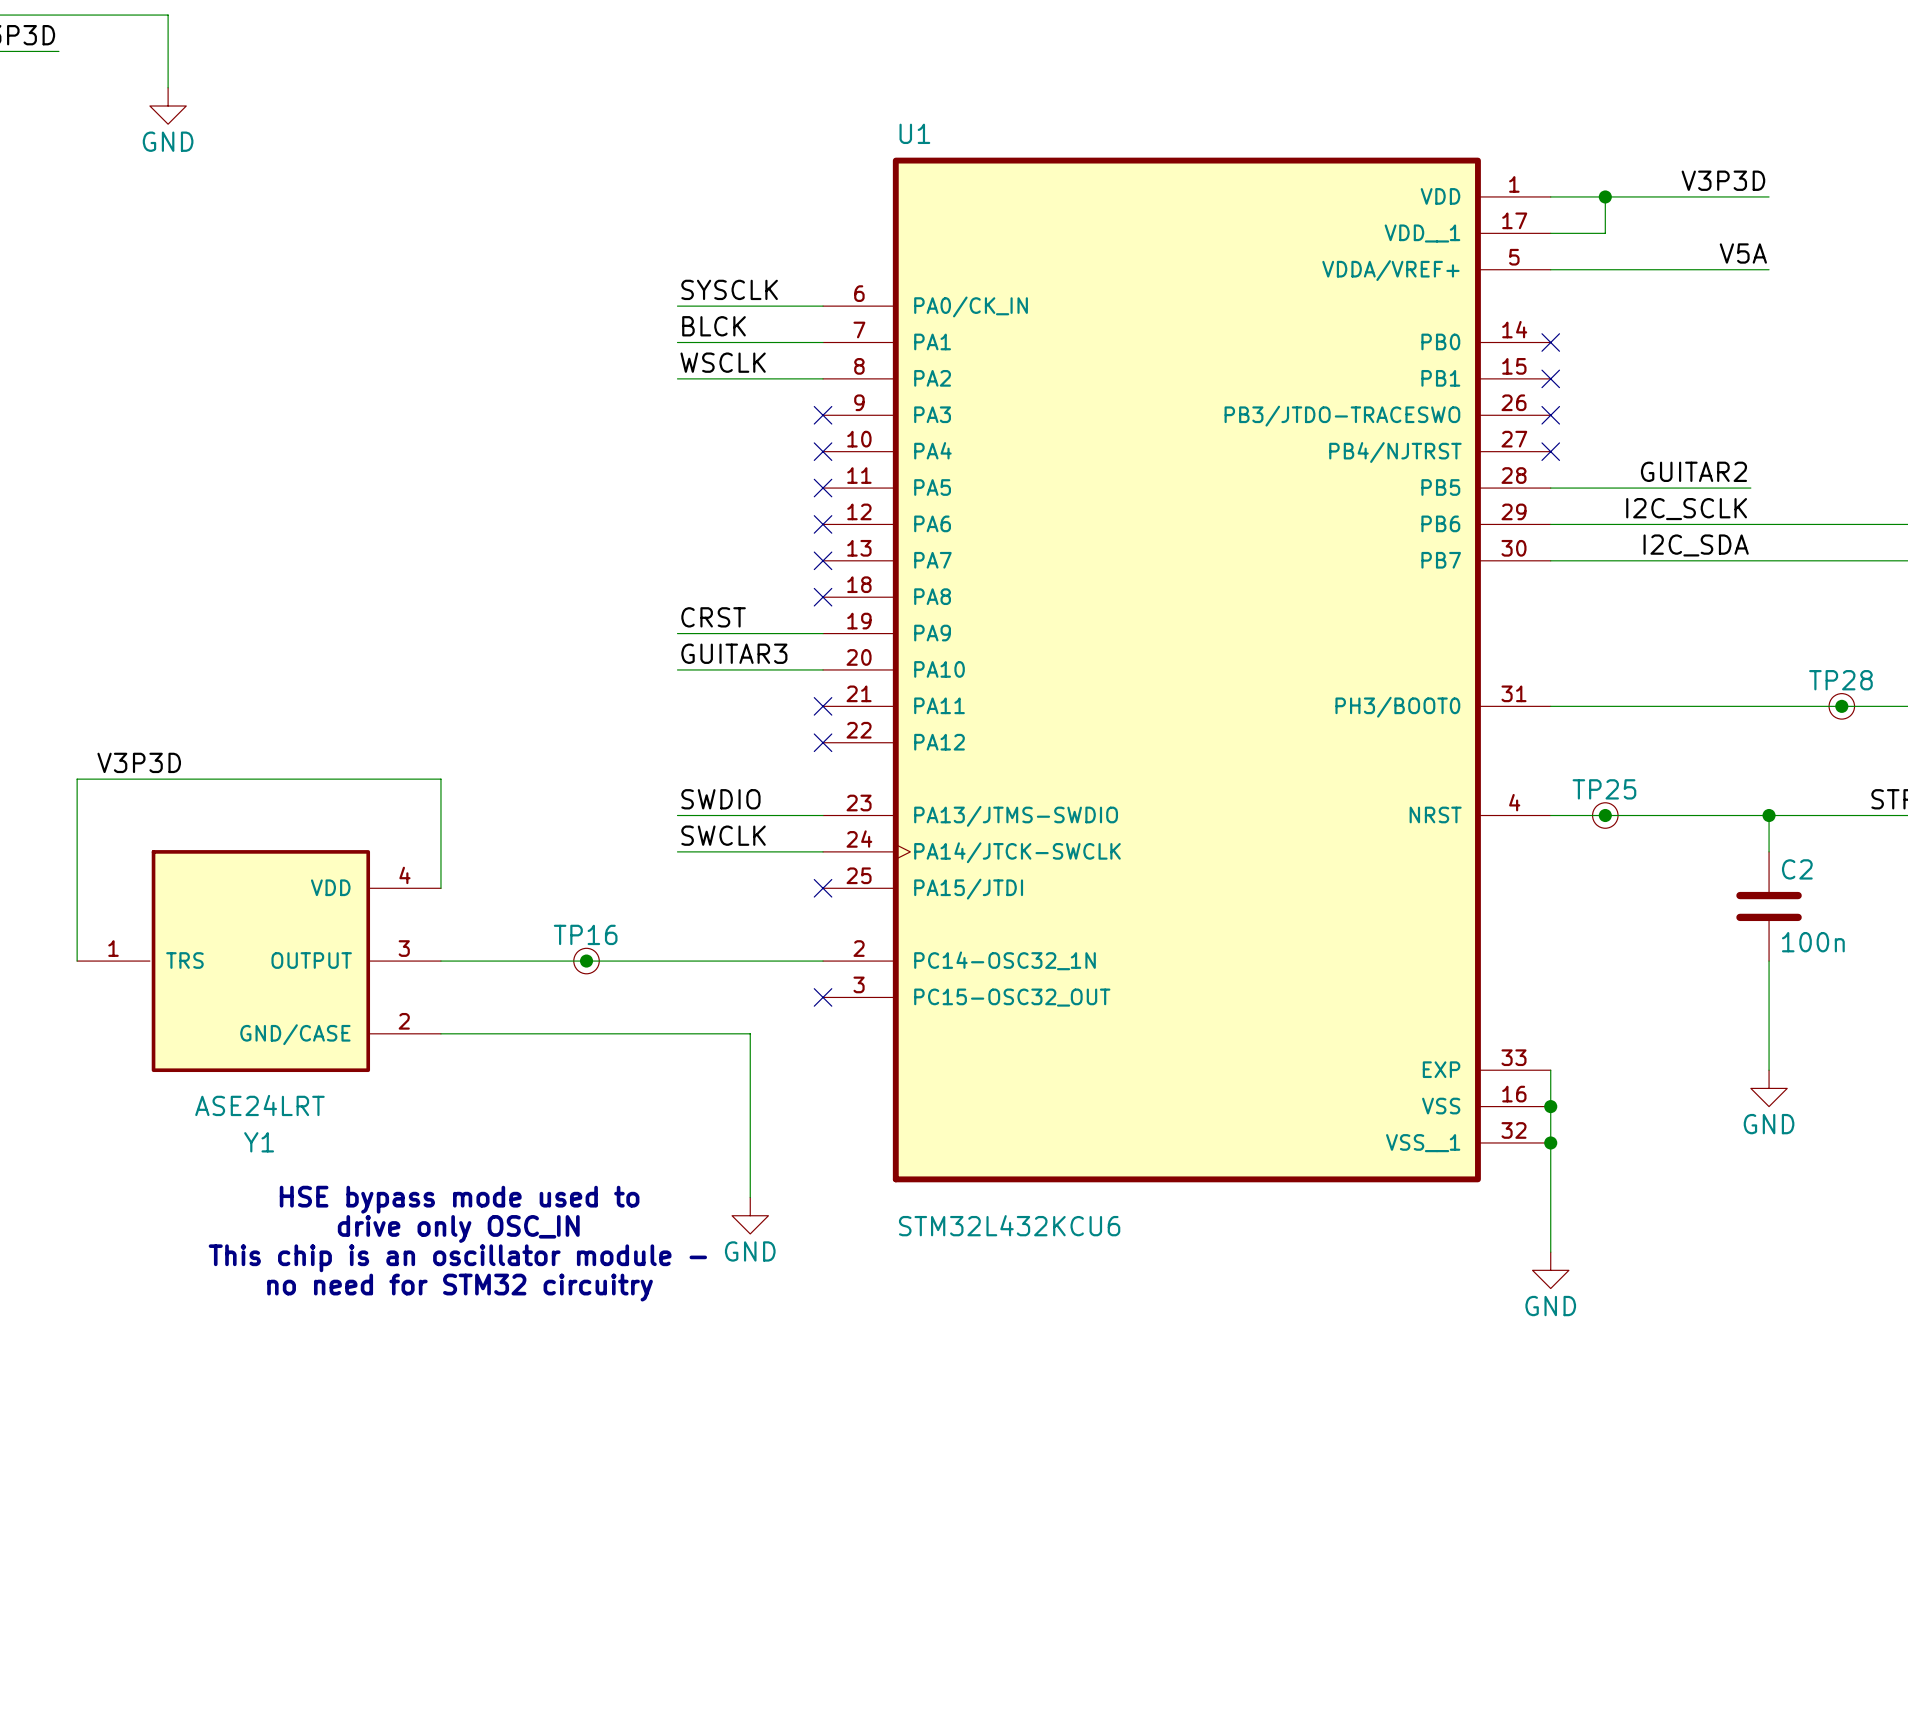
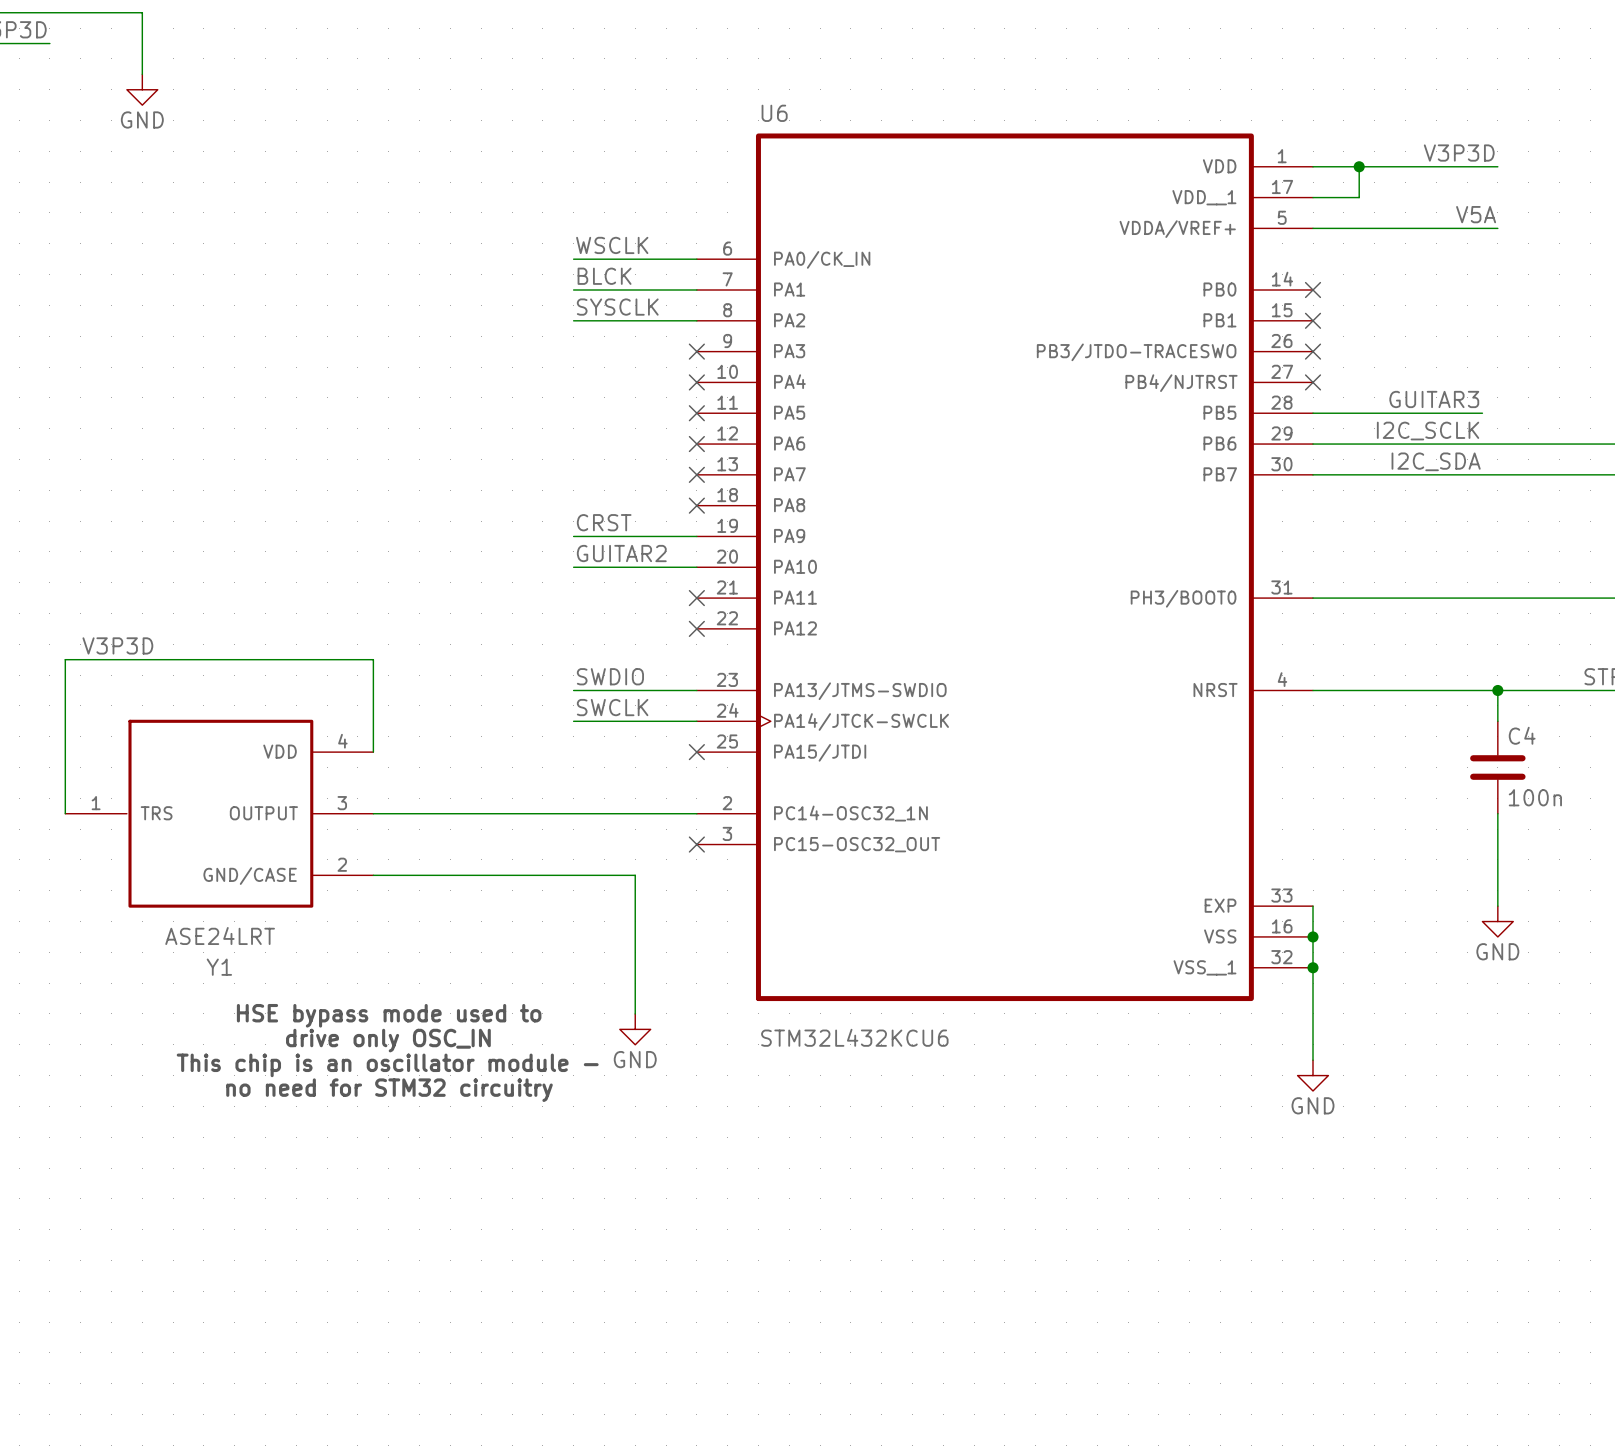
U1 name: U1 (914, 133) -> U6 (774, 113)
label: SYSCLK (729, 289) -> WSCLK (612, 245)
label: WSCLK (723, 362) -> SYSCLK (617, 307)
label: GUITAR2 (1693, 471) -> GUITAR3 (1434, 399)
label: GUITAR3 (734, 653) -> GUITAR2 (621, 553)
junction: (1841, 706) -> none
TP28: (1841, 706) -> none
junction: (1605, 815) -> none
TP25: (1605, 815) -> none
C2 name: C2 (1797, 869) -> C4 (1522, 735)
junction: (586, 961) -> none
TP16: (586, 961) -> none

